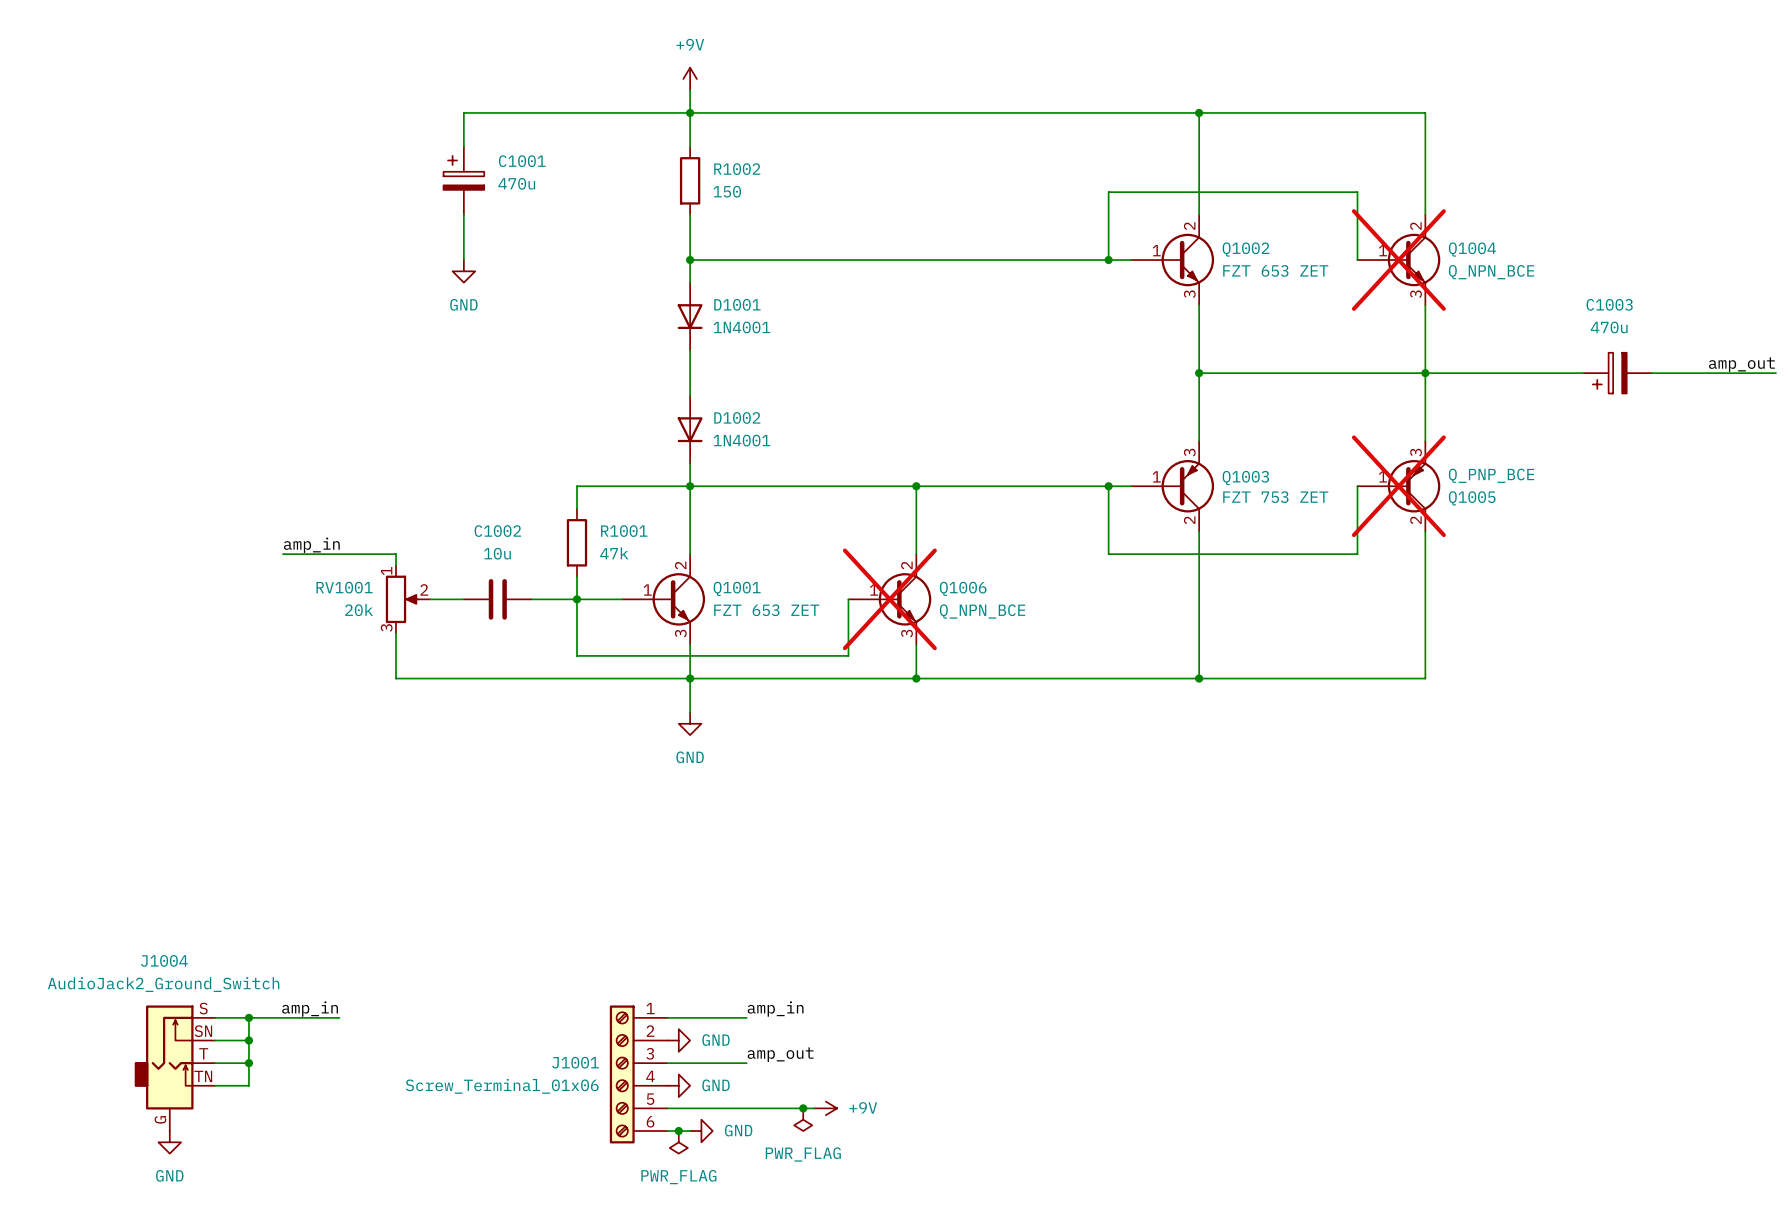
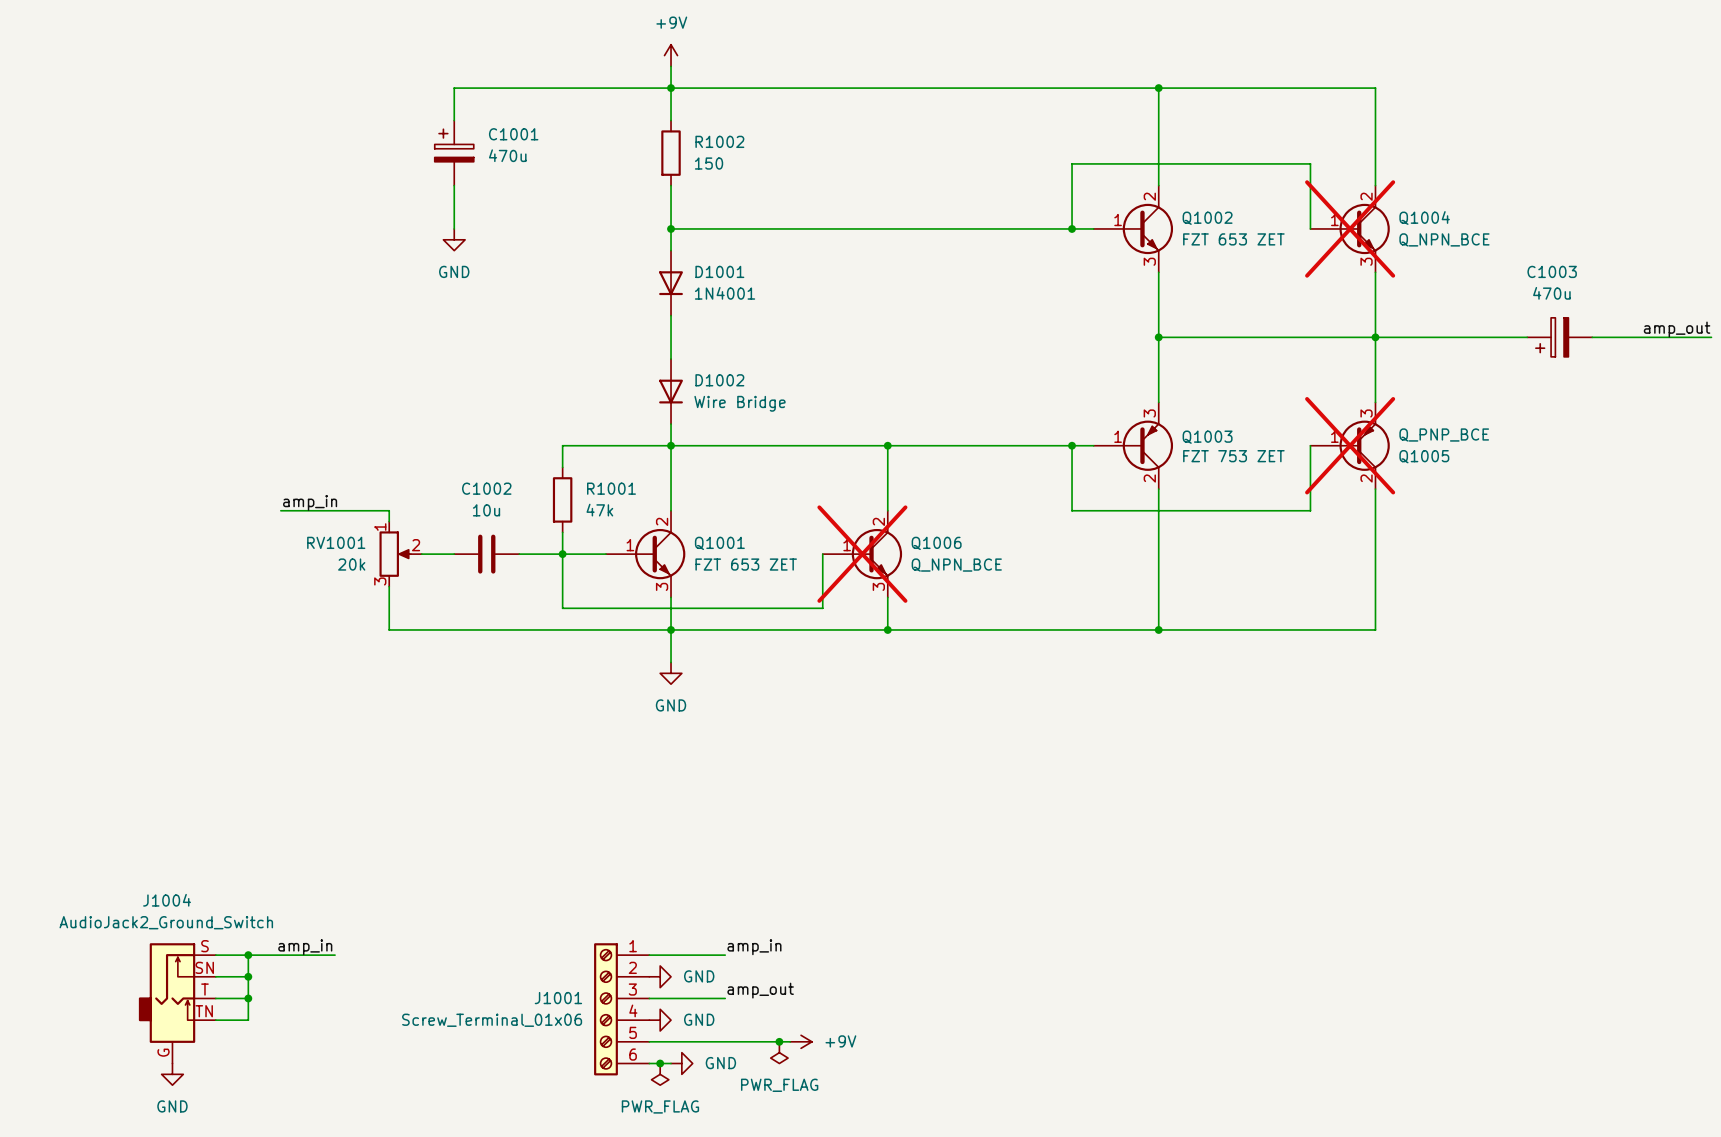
D1002 value: 1N4001 (741, 440) -> Wire Bridge (739, 403)

